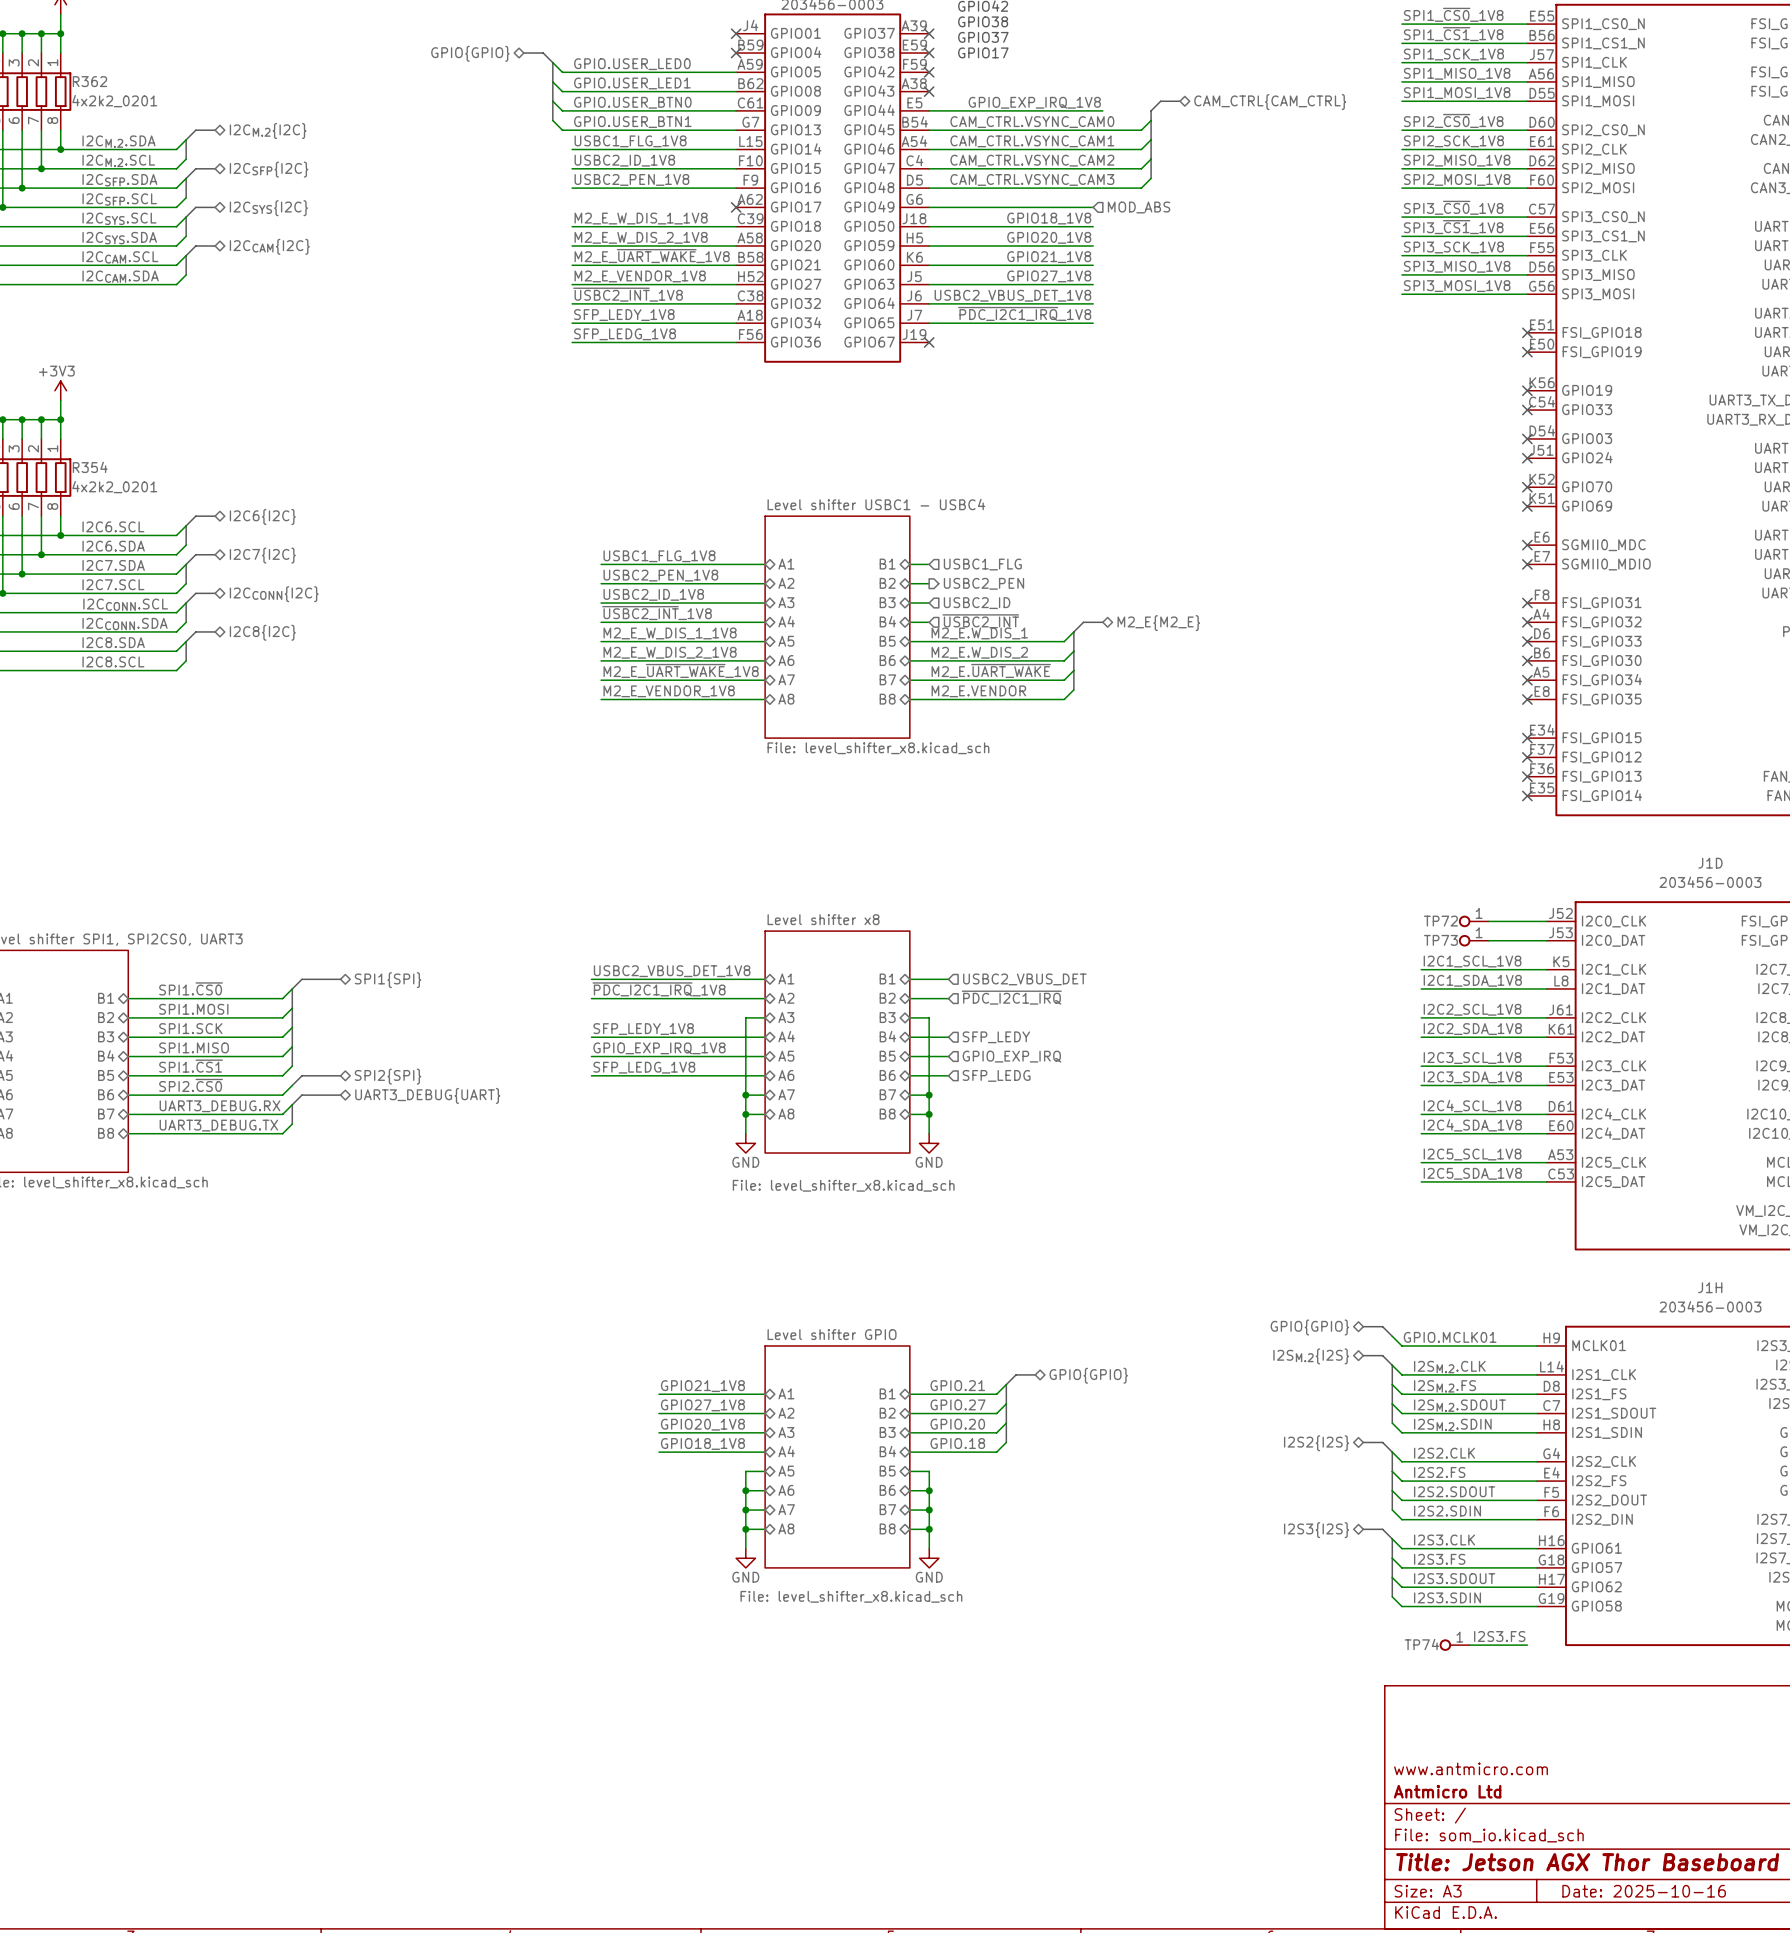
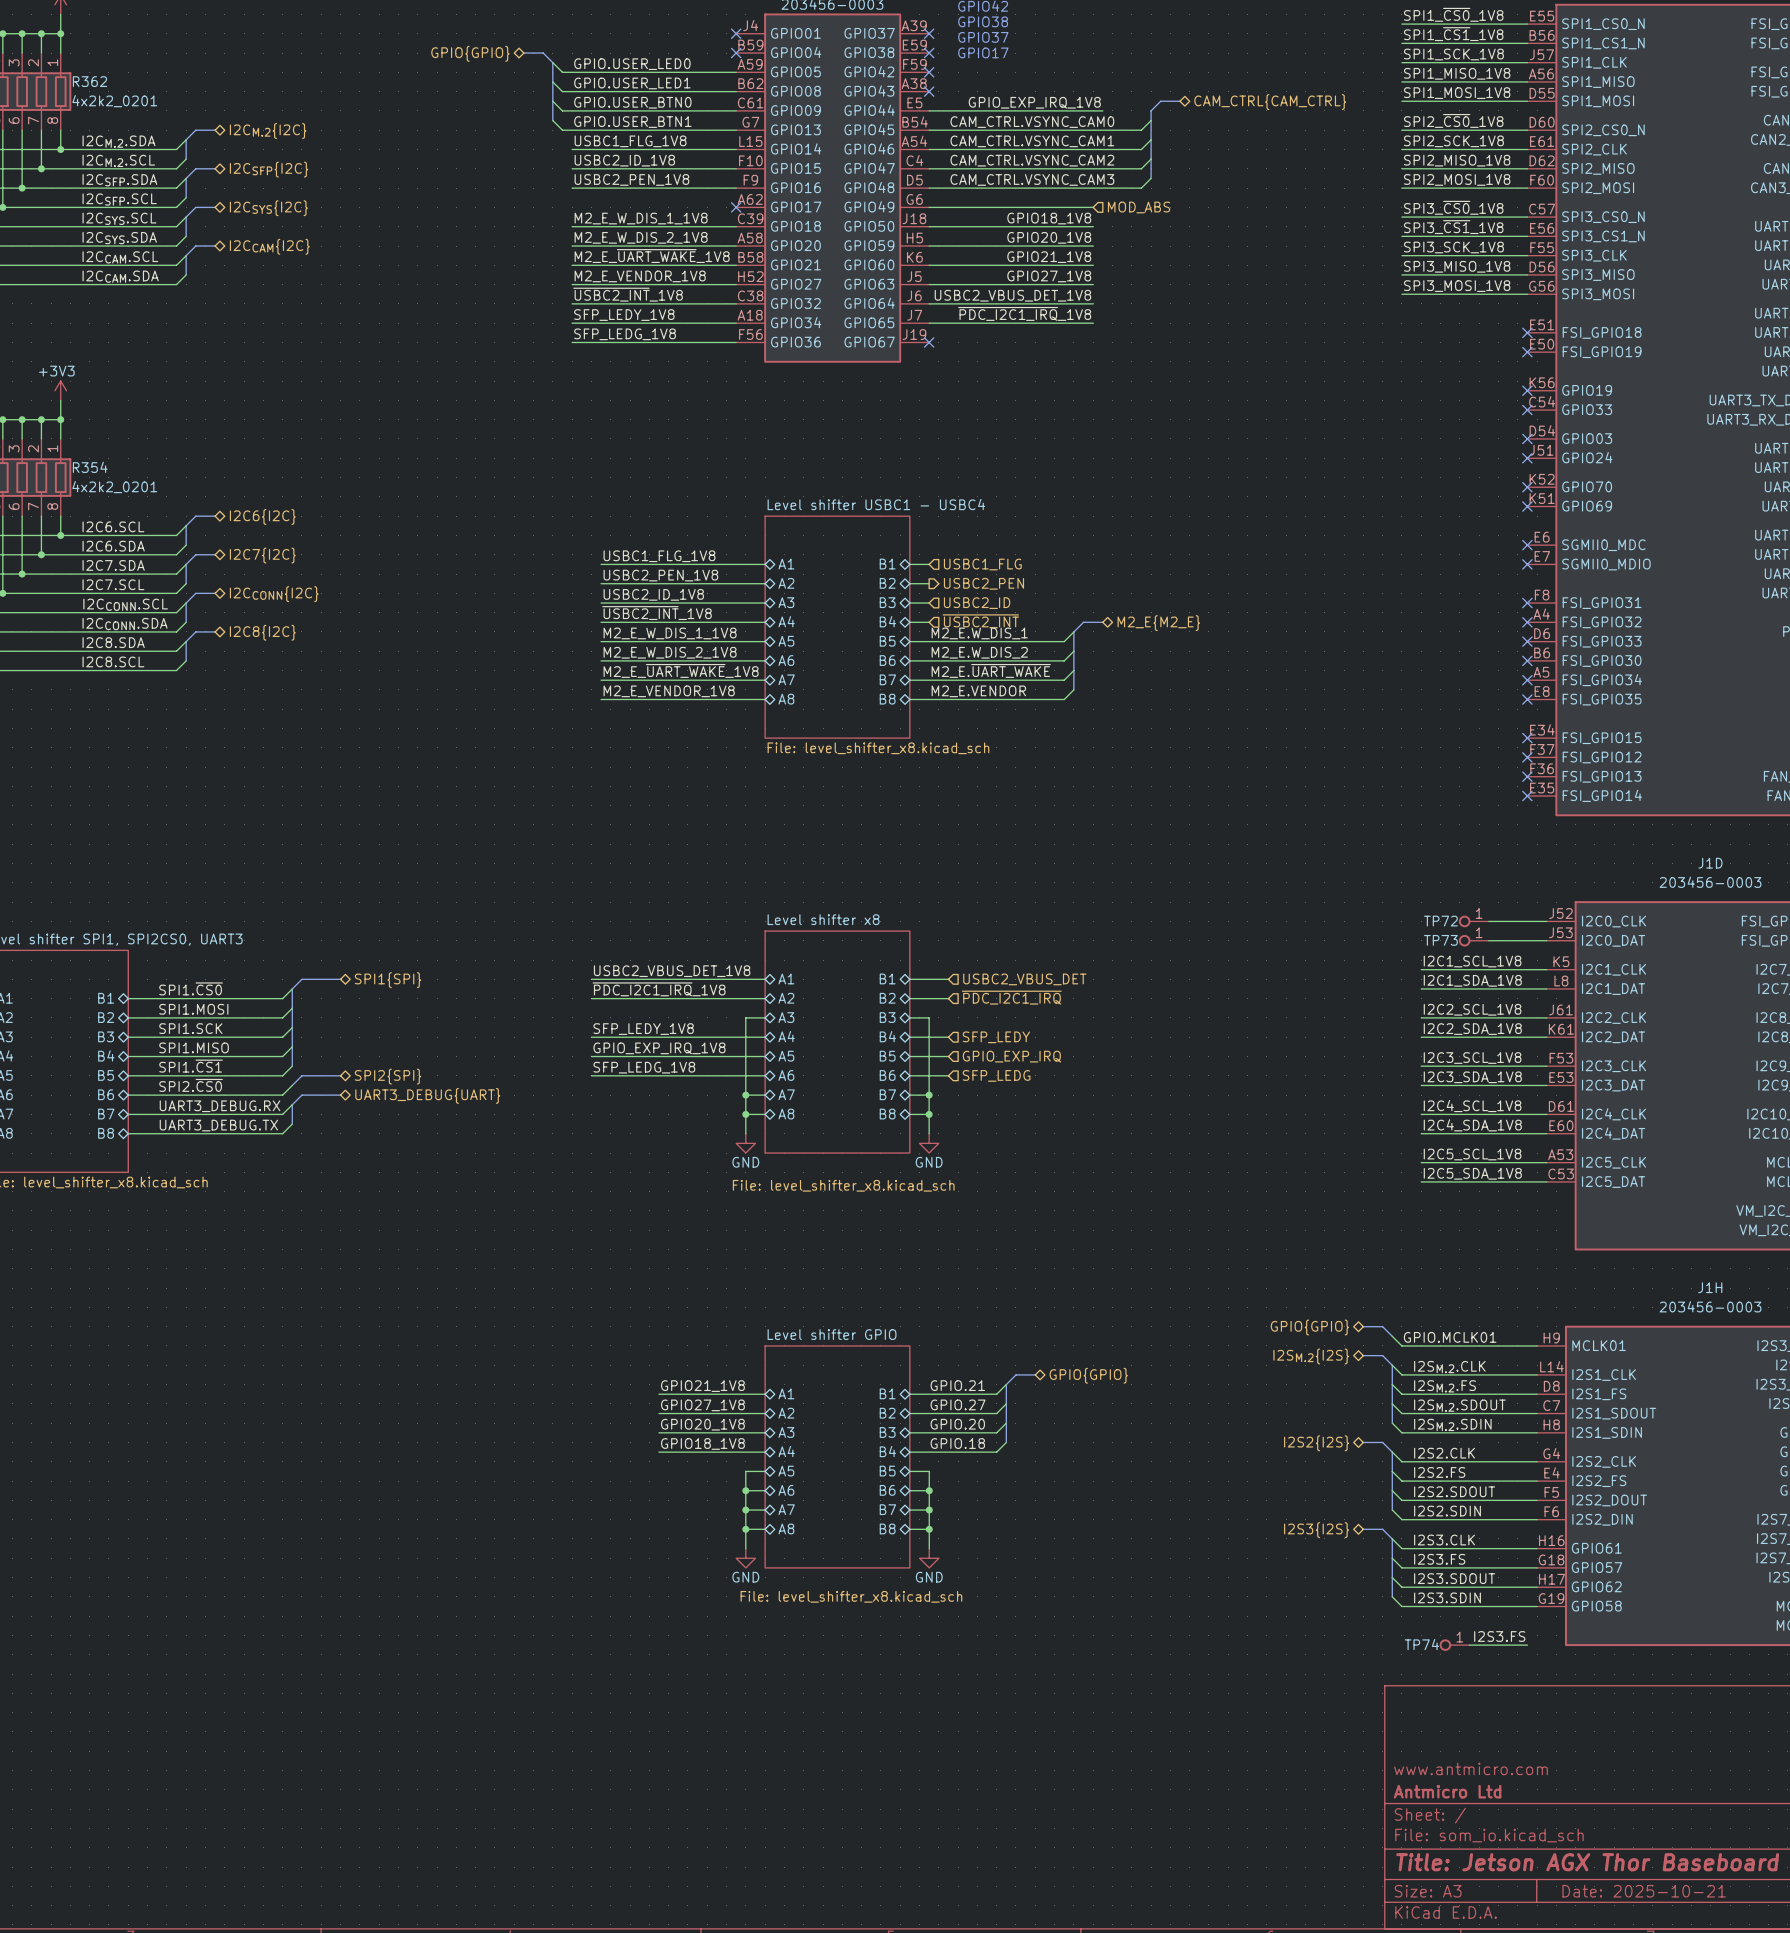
title block: Date: 2025-10-16 (1644, 1891) -> Date: 2025-10-21 (1644, 1891)

